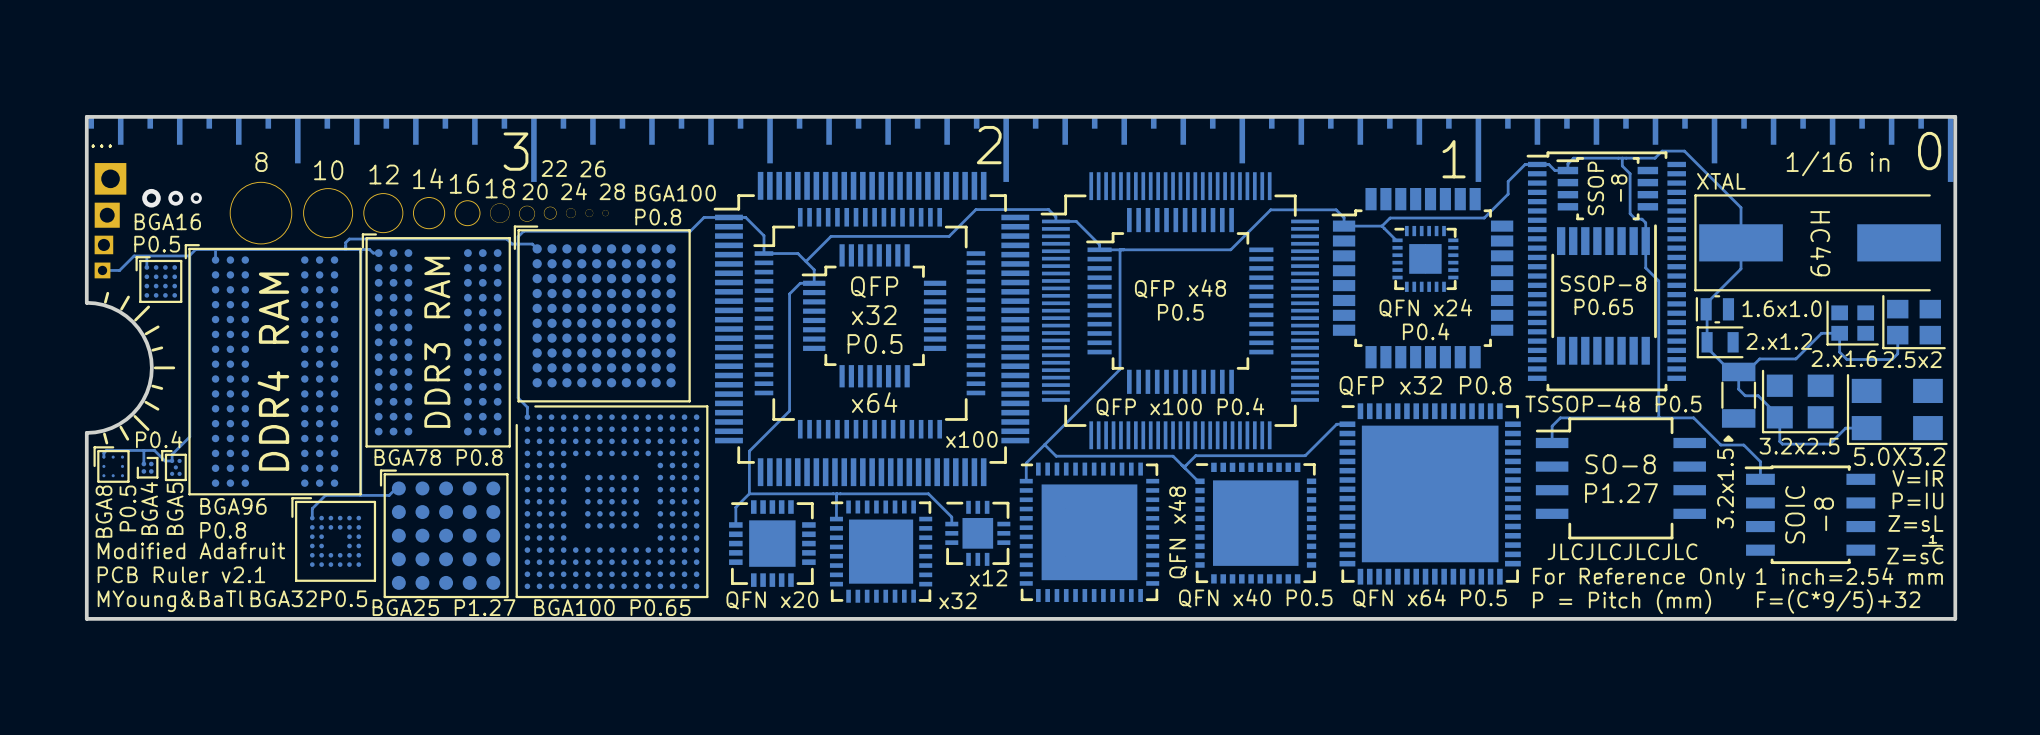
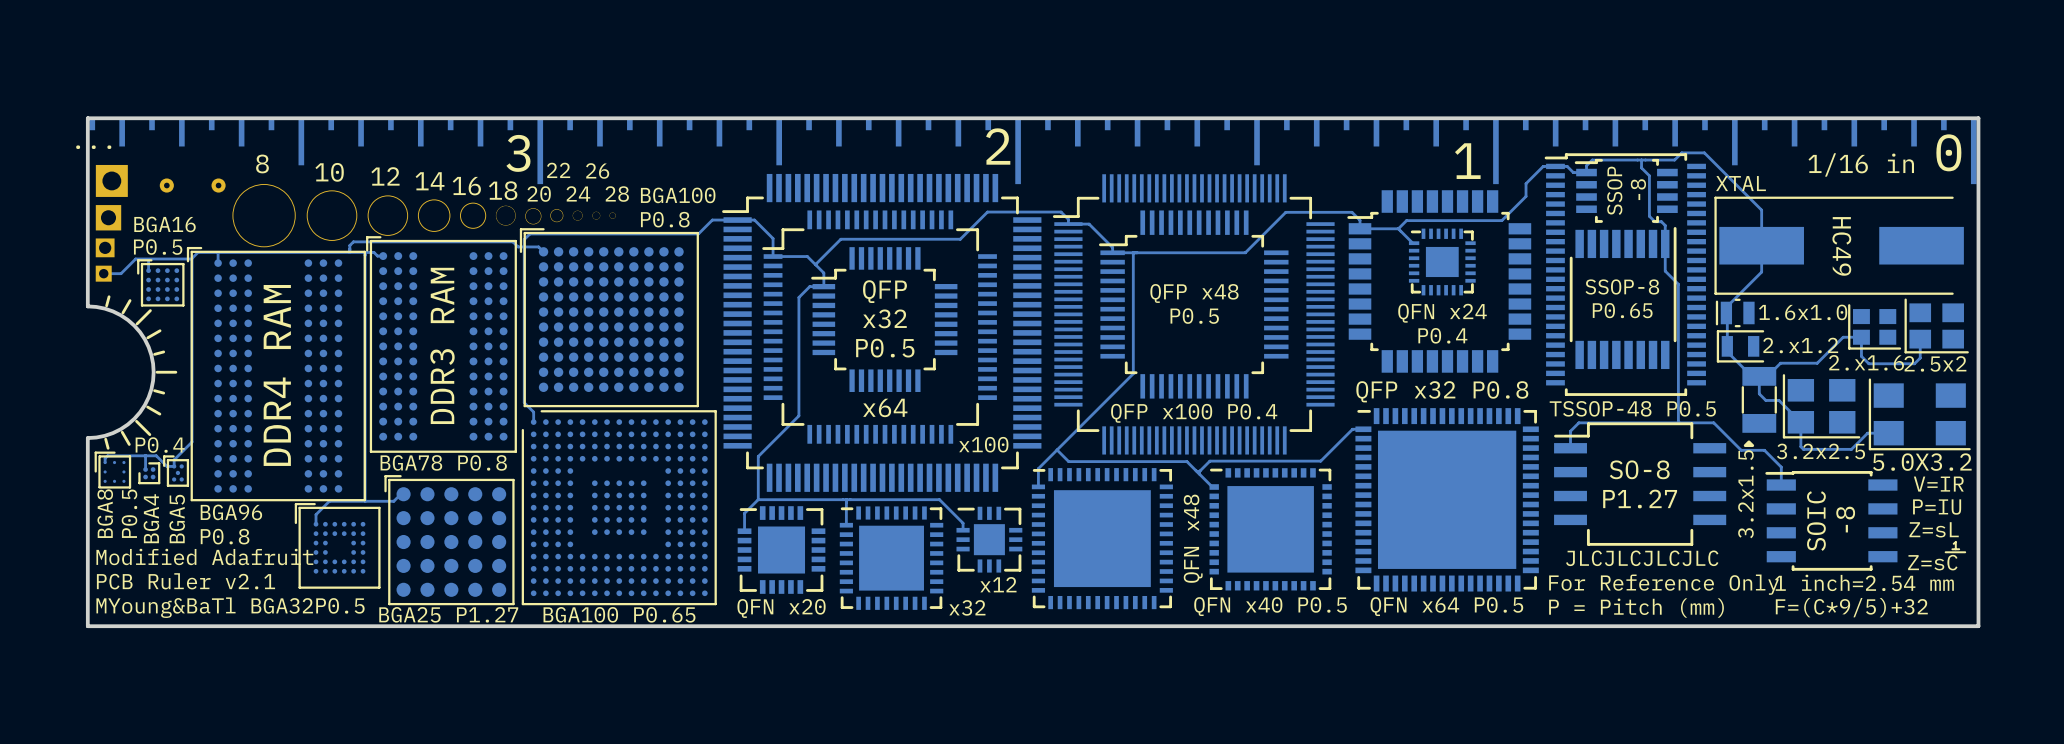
part: none -> (192, 185)
via: (151, 198) -> none
via: (175, 198) -> none
via: (196, 198) -> none

